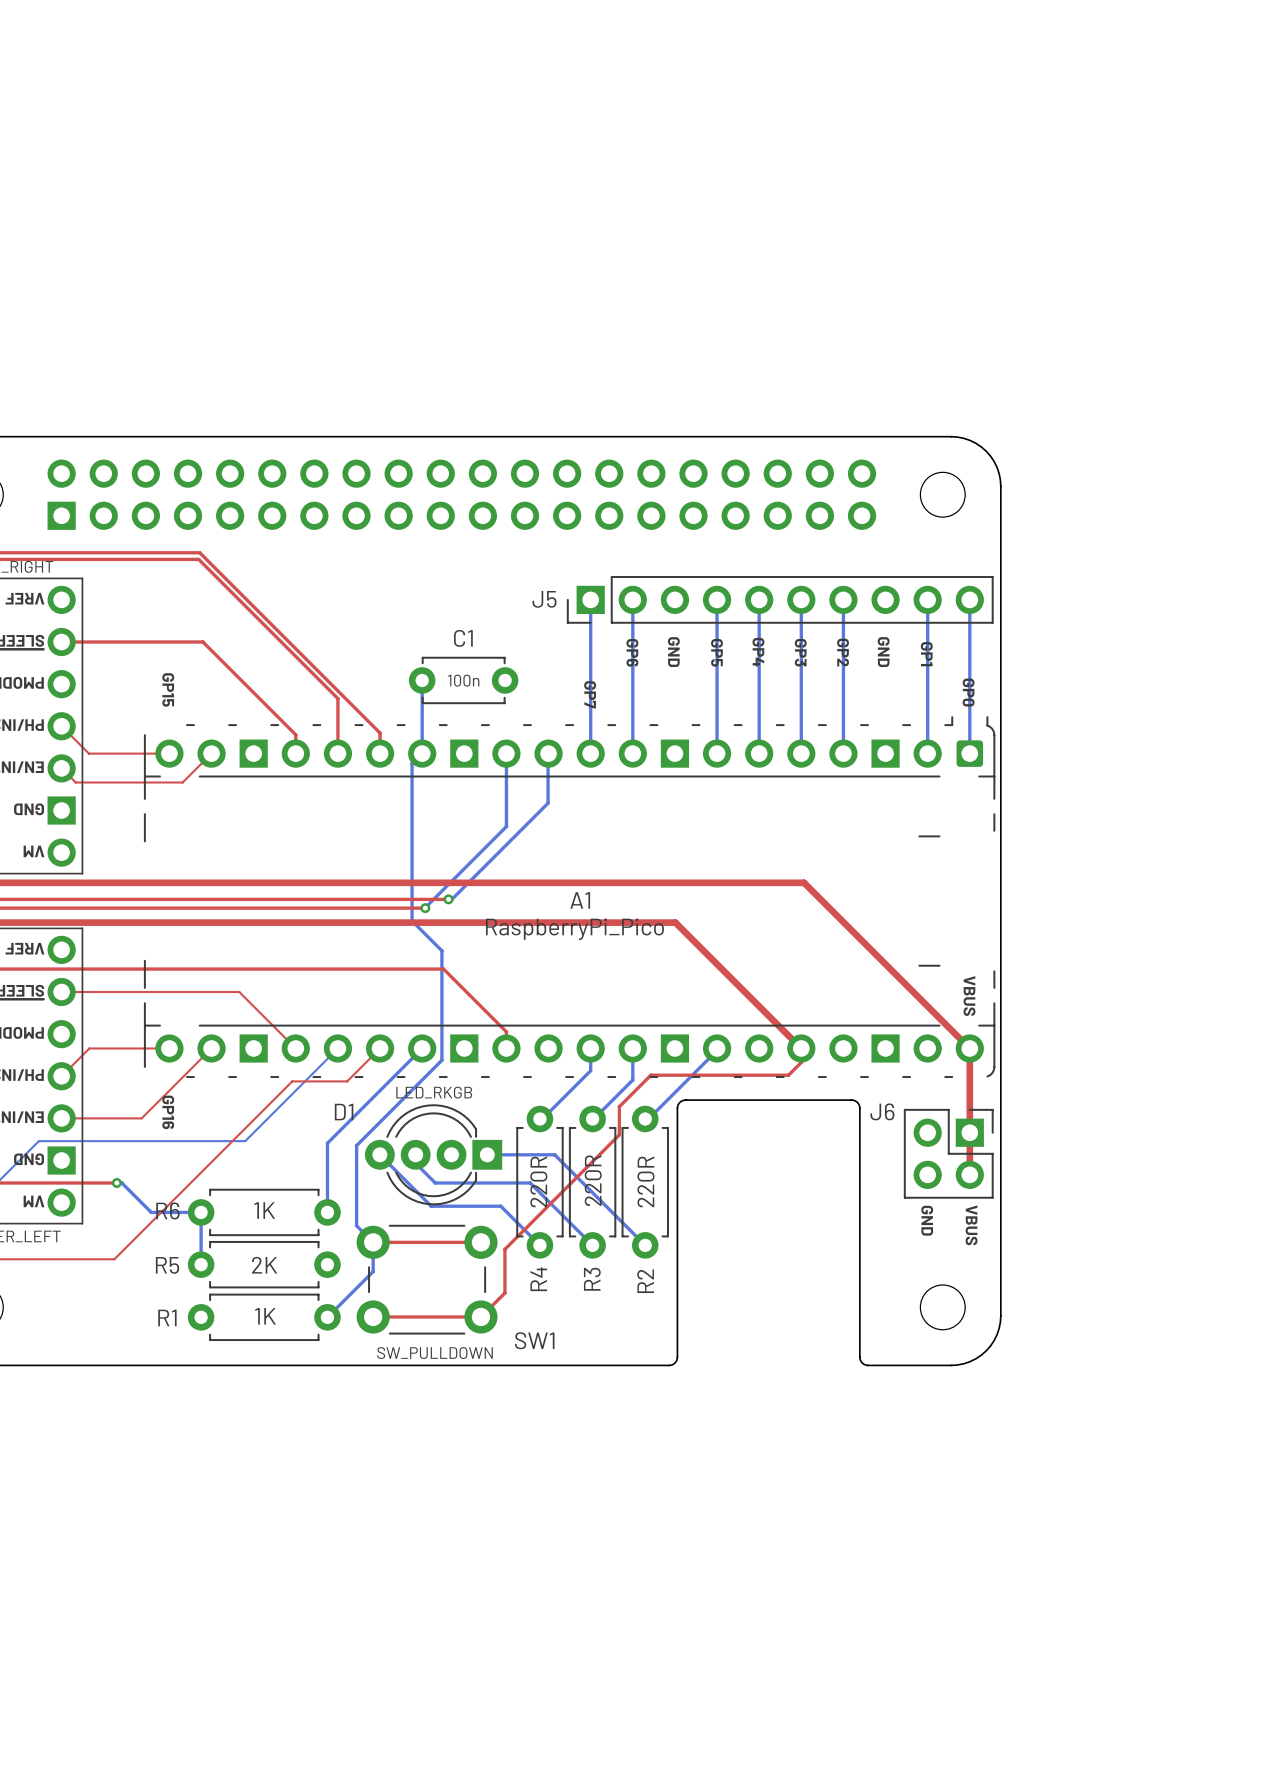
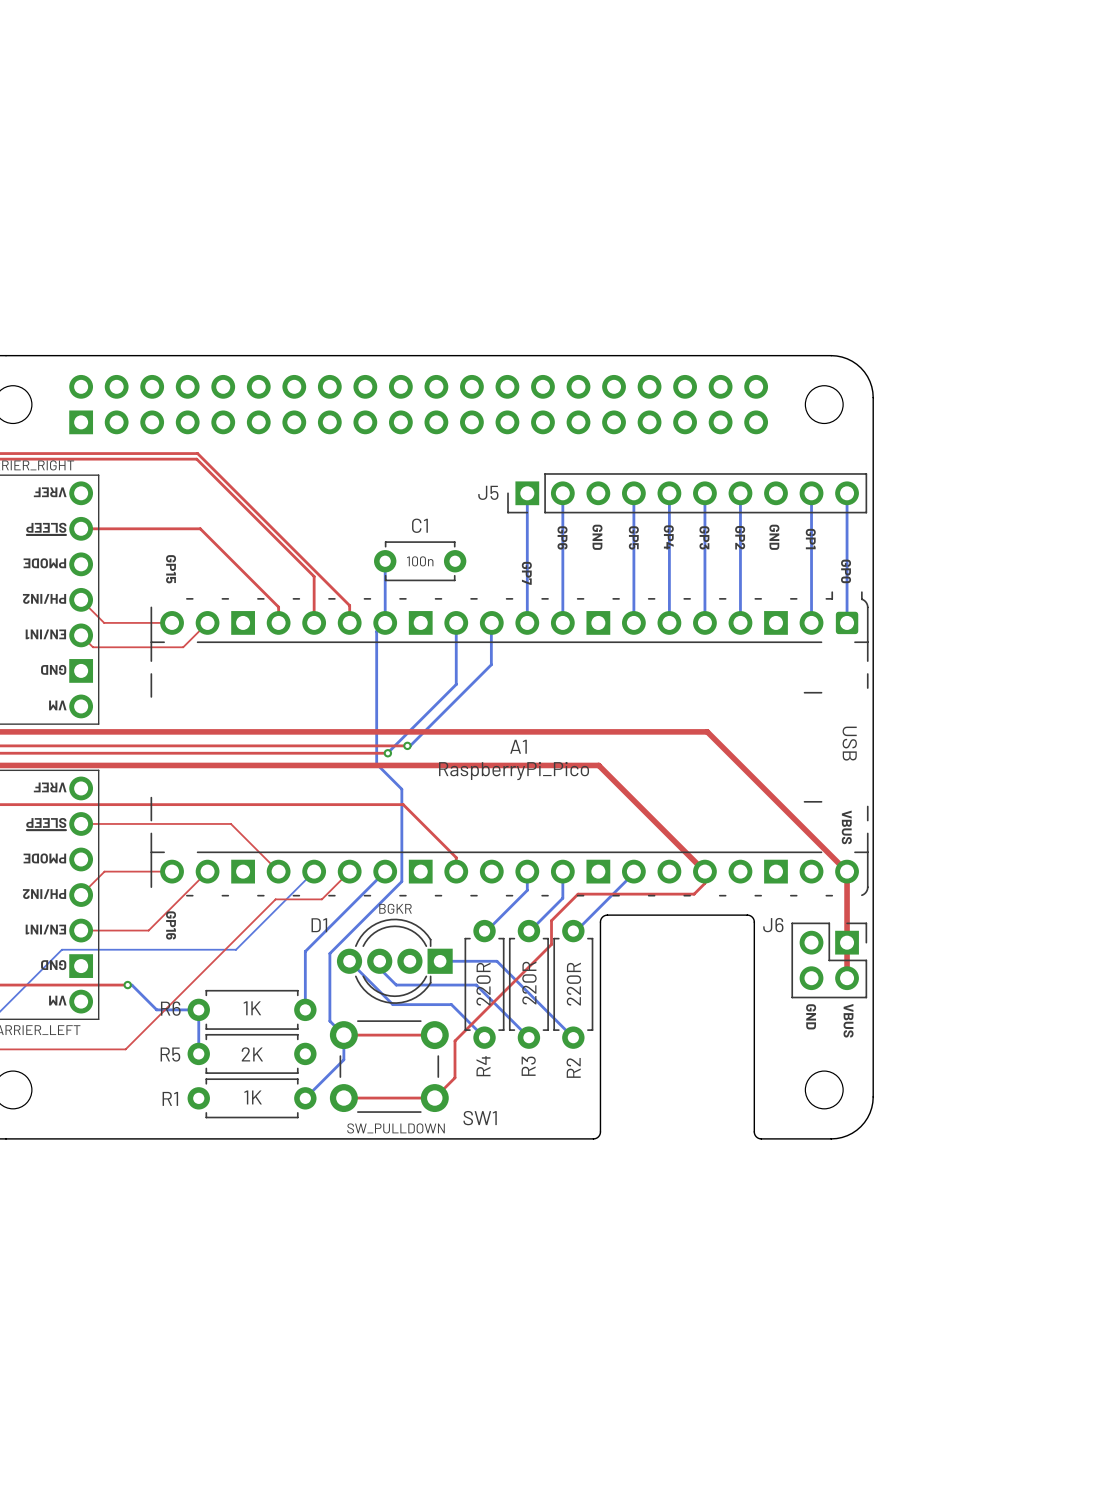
text: none -> USB (849, 743)
D1 value: LED_RKGB (434, 1092) -> BGKR (395, 908)

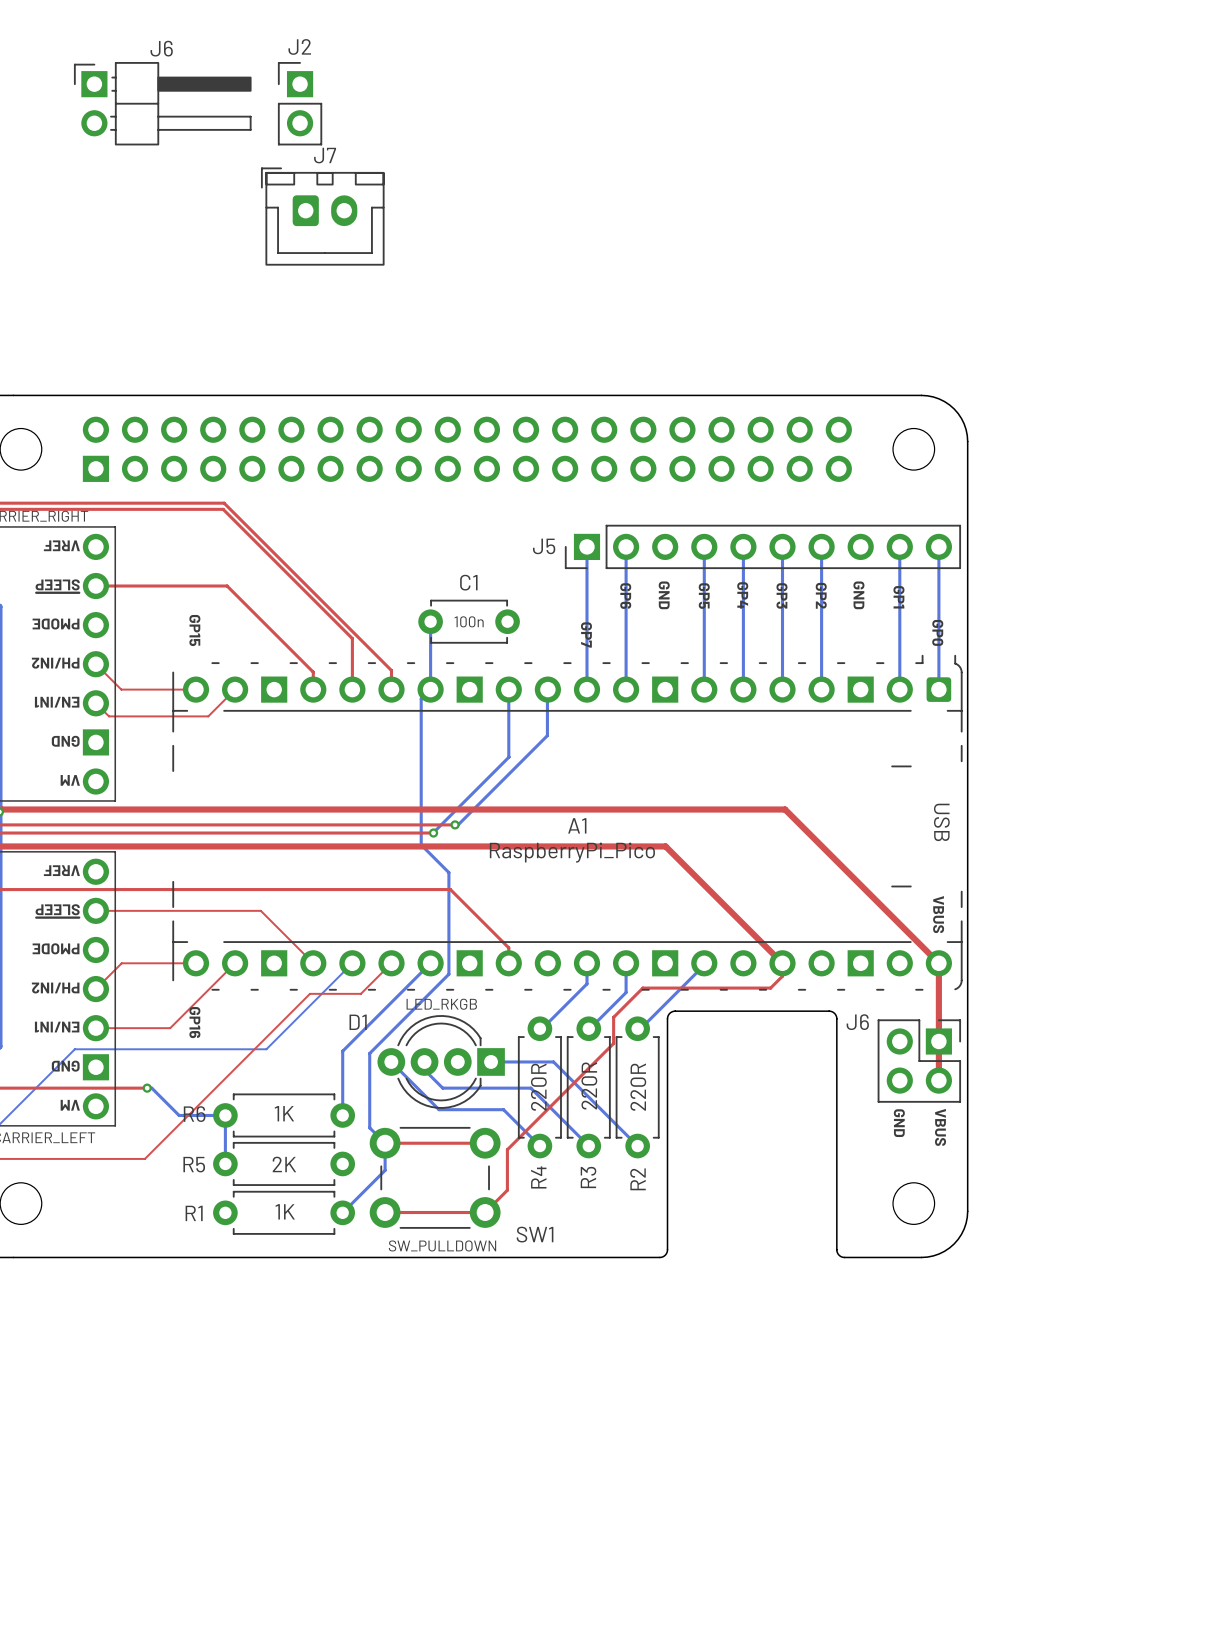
J6: none -> (162, 103)
J2: none -> (300, 103)
J7: none -> (322, 216)
D1 value: BGKR (395, 908) -> LED_RKGB (441, 1004)

